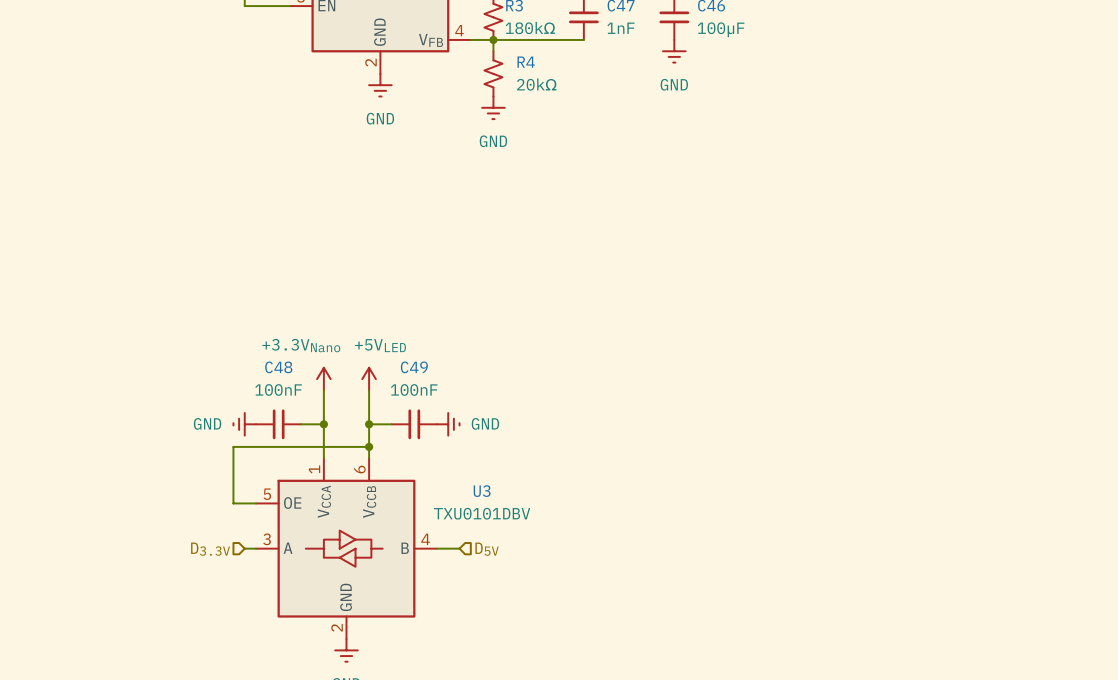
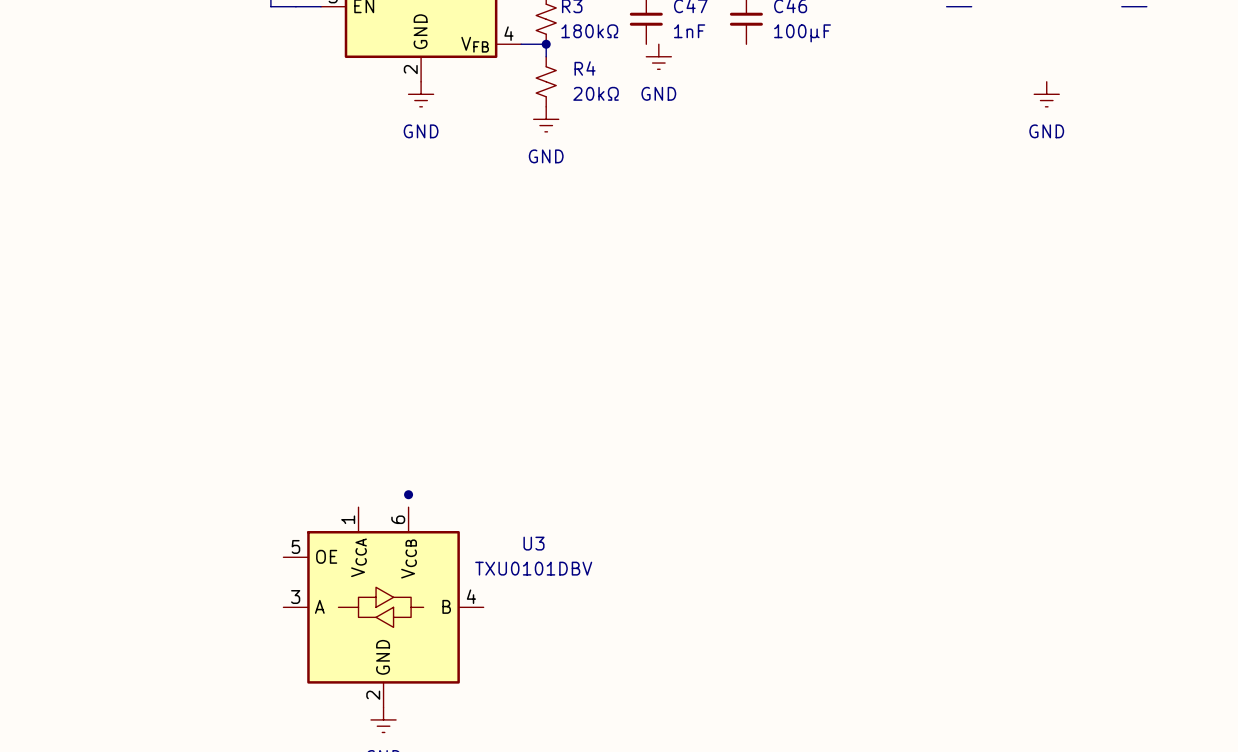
wire: none -> (946, 6) (971, 6)
wire: none -> (1121, 6) (1146, 6)
wire: (493, 39) (583, 39) -> none
power symbol position: GND (674, 51) -> GND (658, 56)
power symbol: none -> GND (1046, 94)
power symbol: +3.3VNano (323, 379) -> none
power symbol: +5VLED (369, 379) -> none
wire: (323, 390) (323, 458) -> none
wire: (369, 390) (369, 458) -> none
power symbol: GND (244, 424) -> none
C48: 100nF (278, 424) -> none
wire: (301, 424) (323, 424) -> none
junction: (323, 424) -> none
wire: (369, 424) (391, 424) -> none
junction: (369, 424) -> none
C49: 100nF (414, 424) -> none
power symbol: GND (448, 424) -> none
wire: (369, 446) (233, 446) (233, 503) (256, 503) -> none
wire: (244, 548) (256, 548) -> none
wire: (436, 548) (459, 548) -> none
hierarchical label: D3.3V (210, 549) -> none
hierarchical label: D5V (487, 549) -> none

